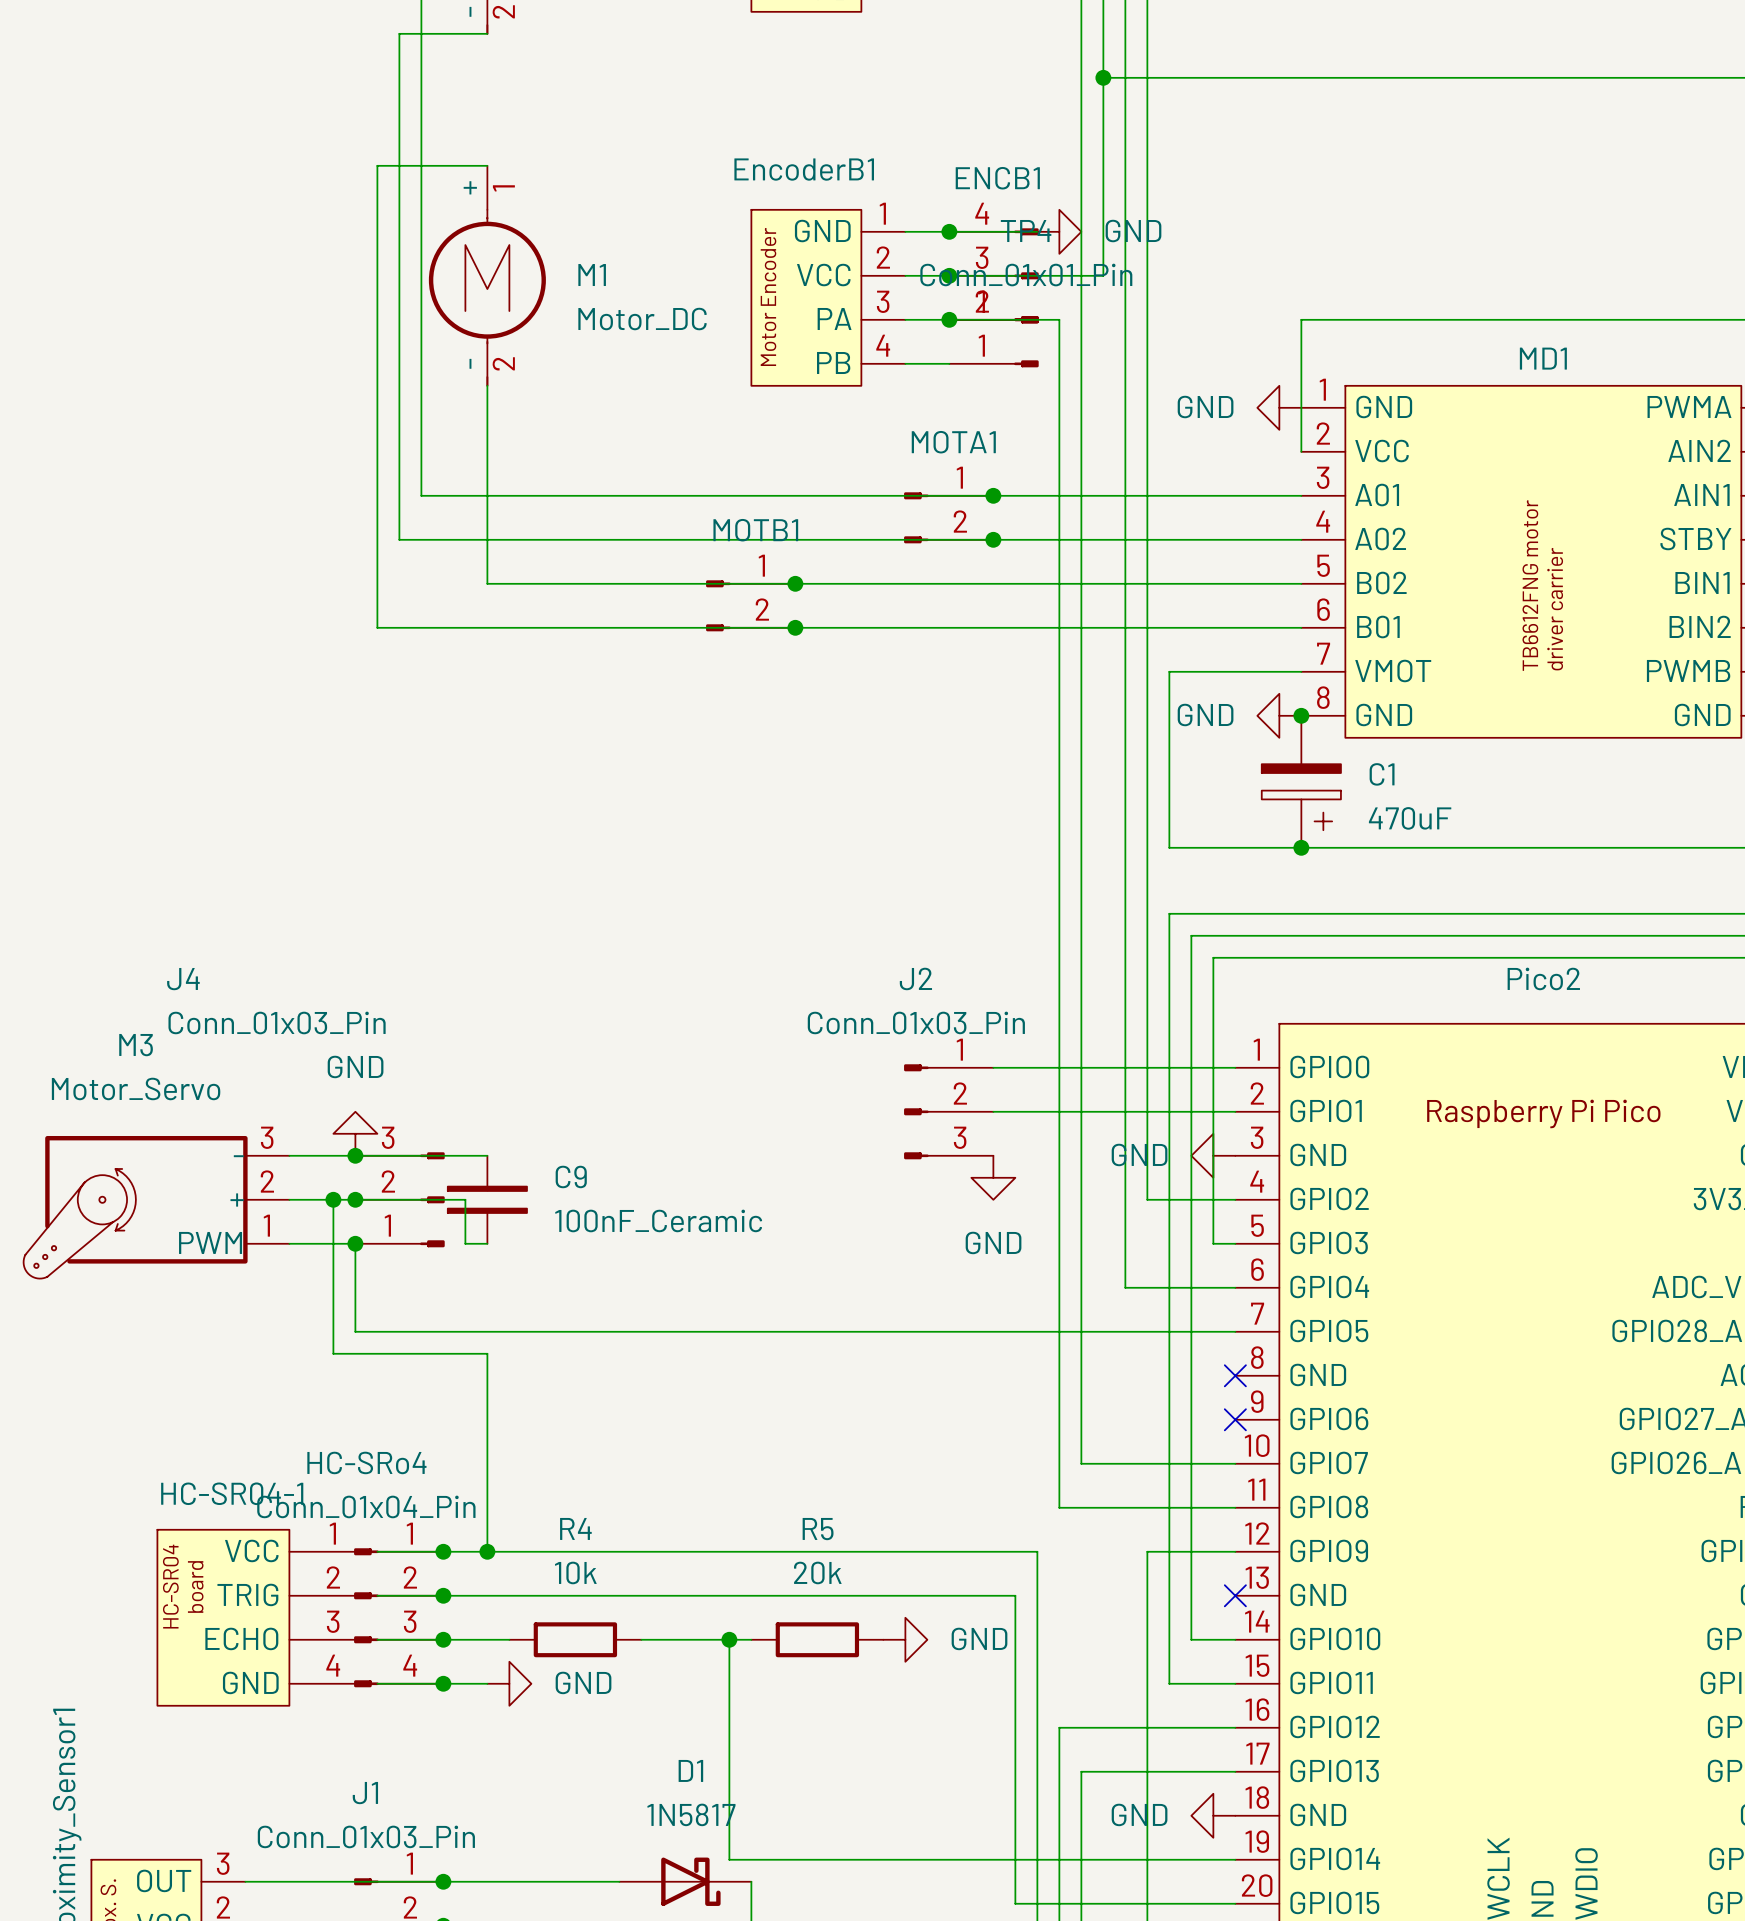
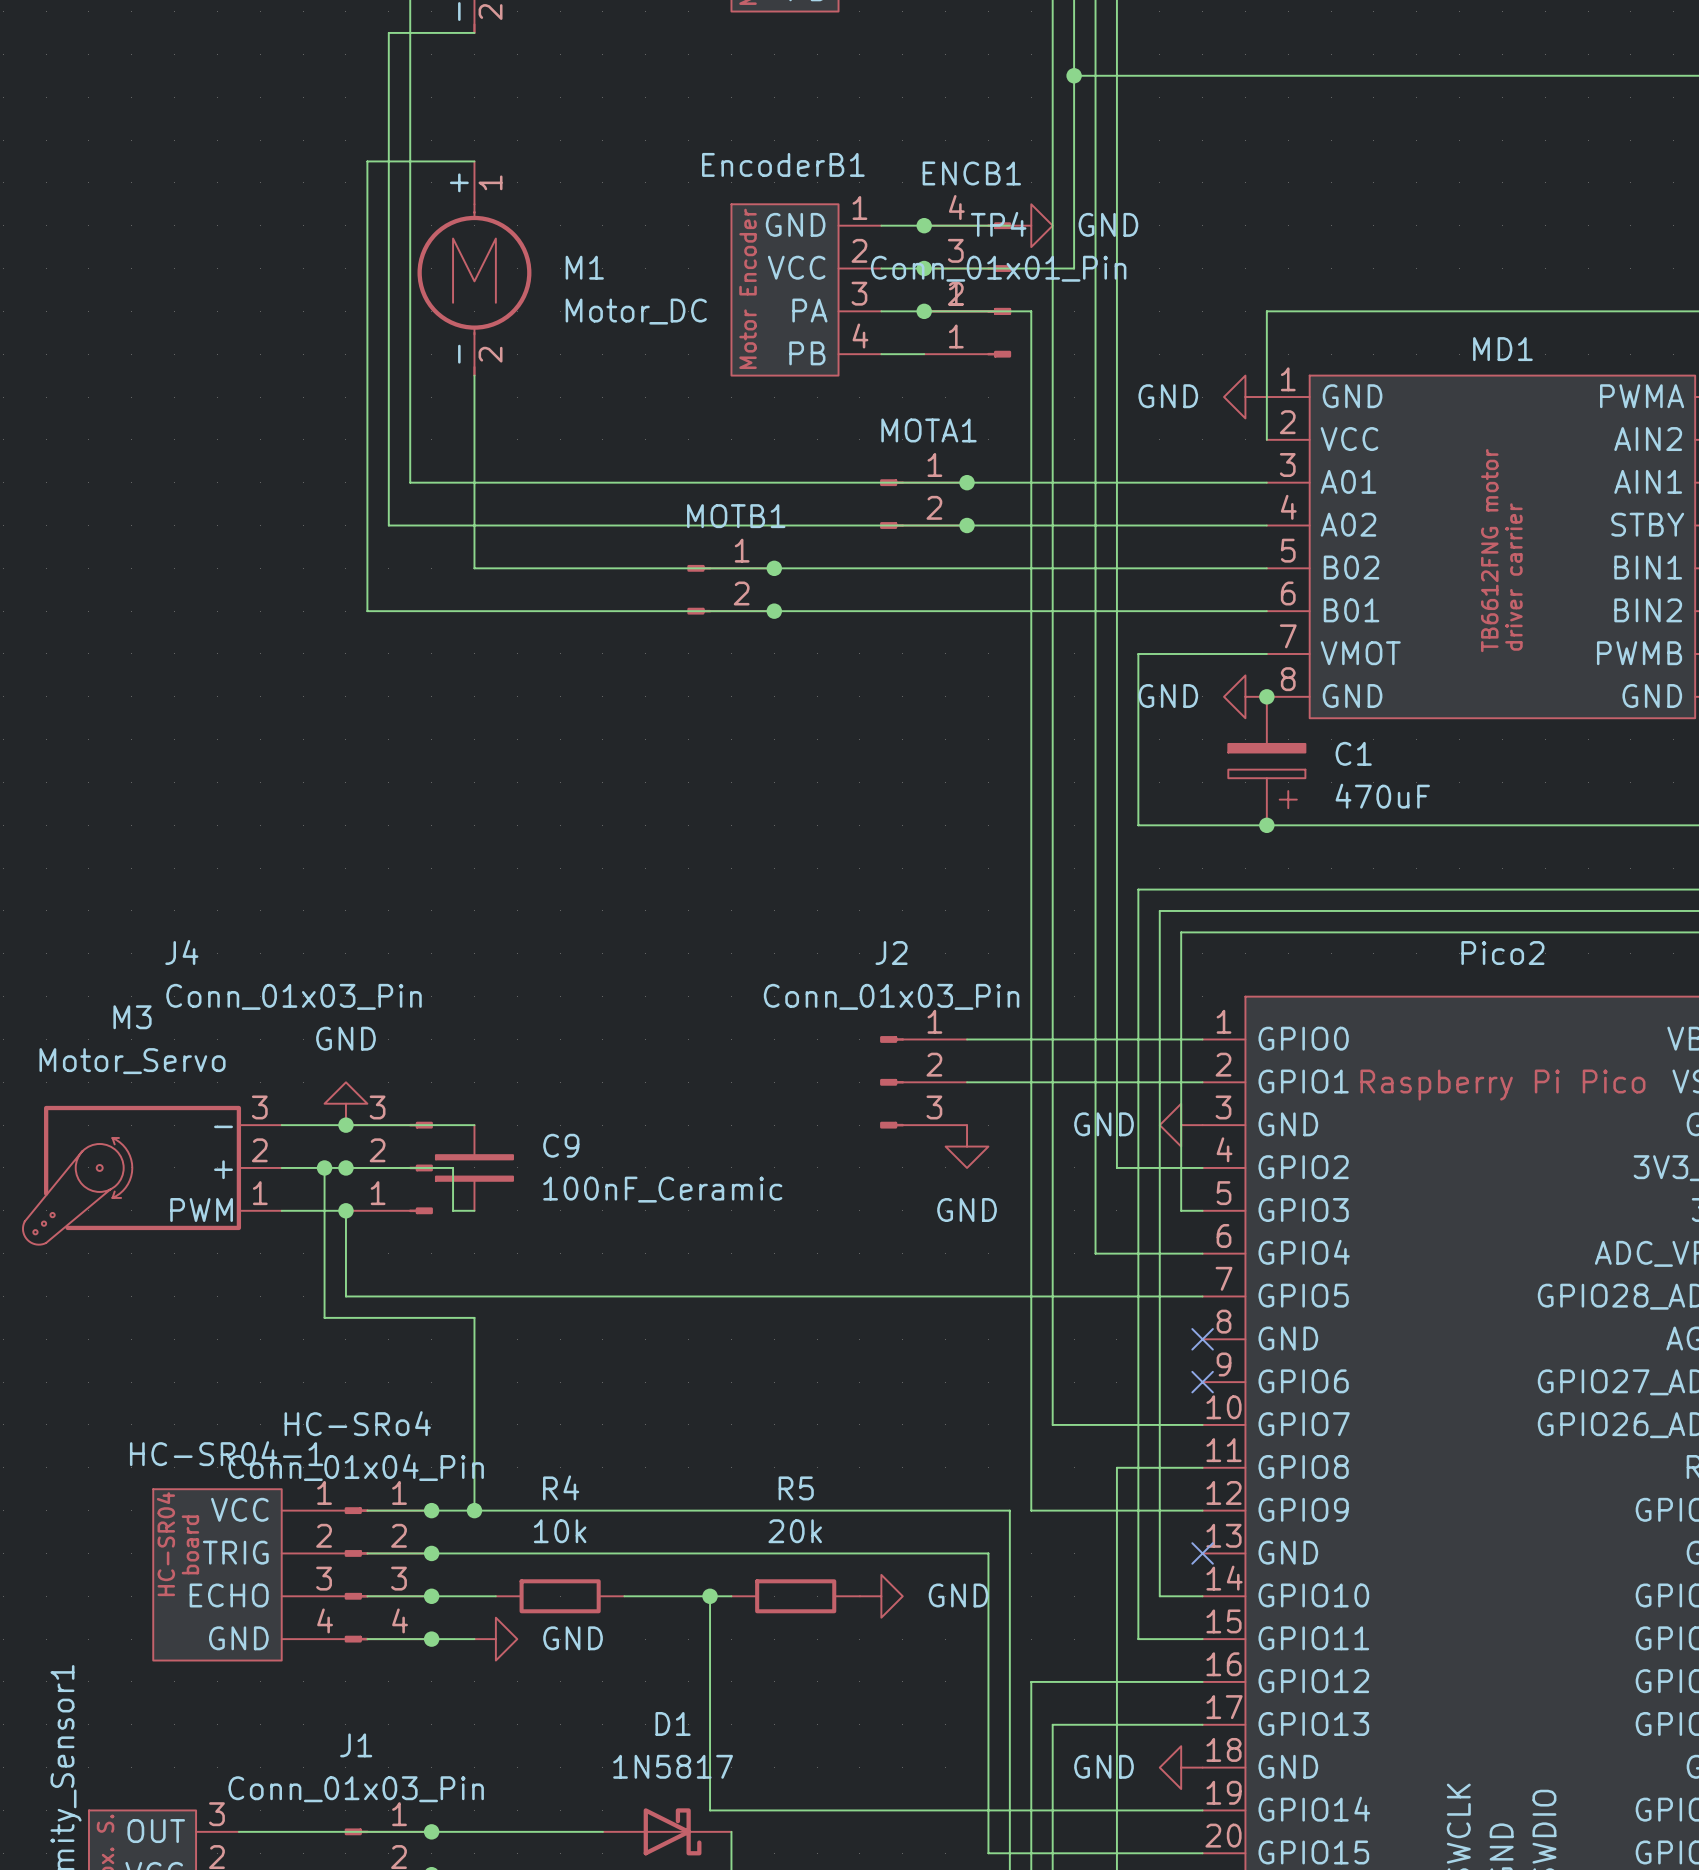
wire: (1059, 1507) (1147, 1507) -> (1031, 1467) (1031, 1510) (1116, 1510) (1116, 1467)

